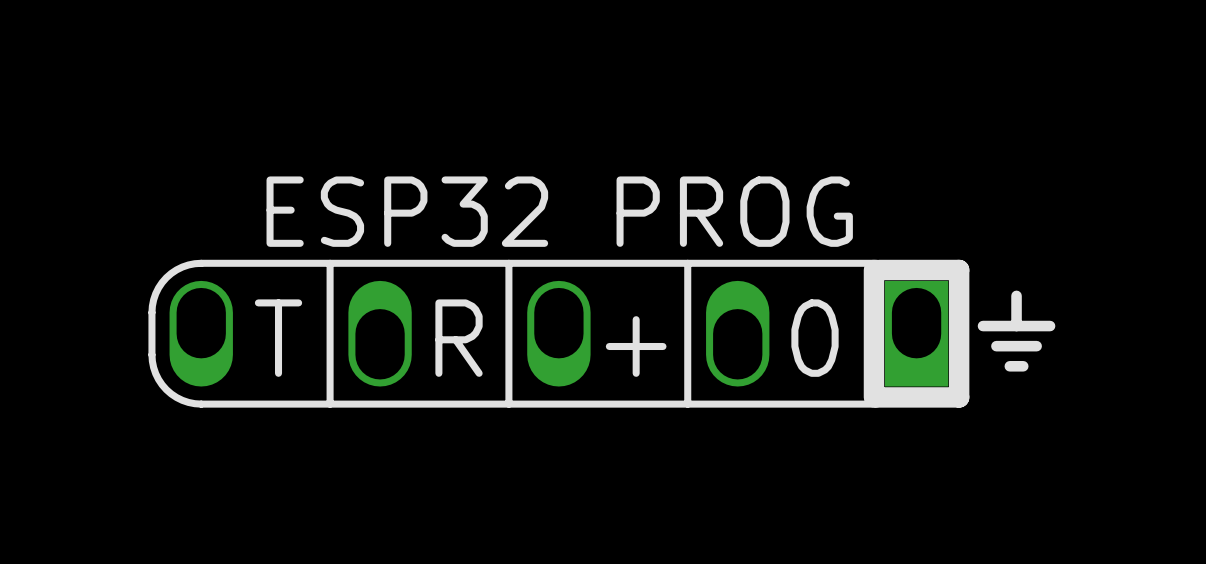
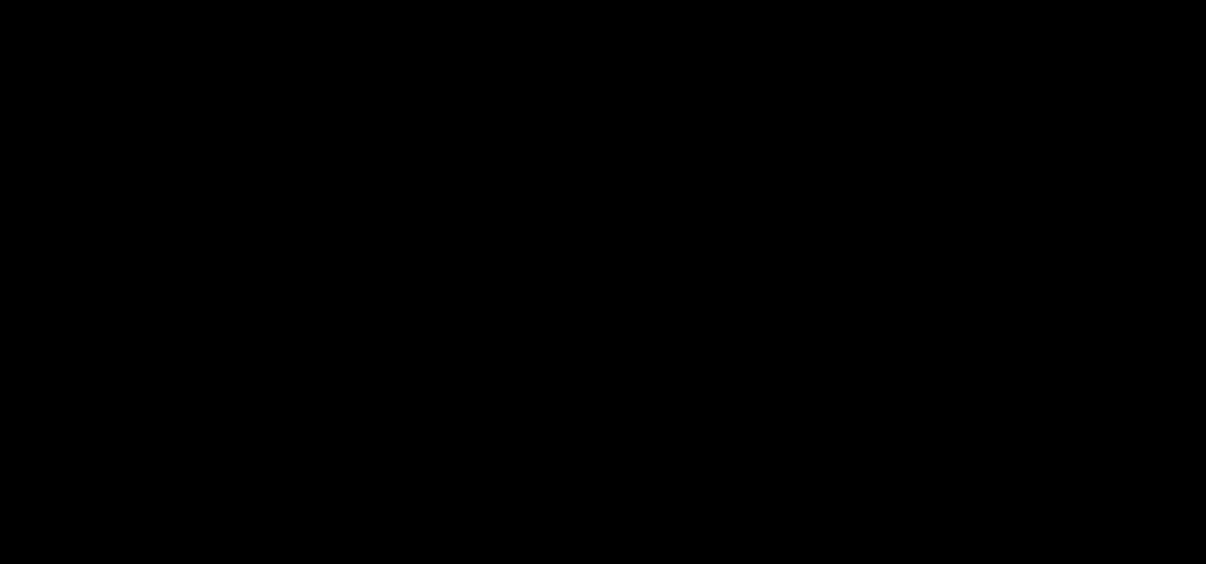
part: (558, 333) -> none

